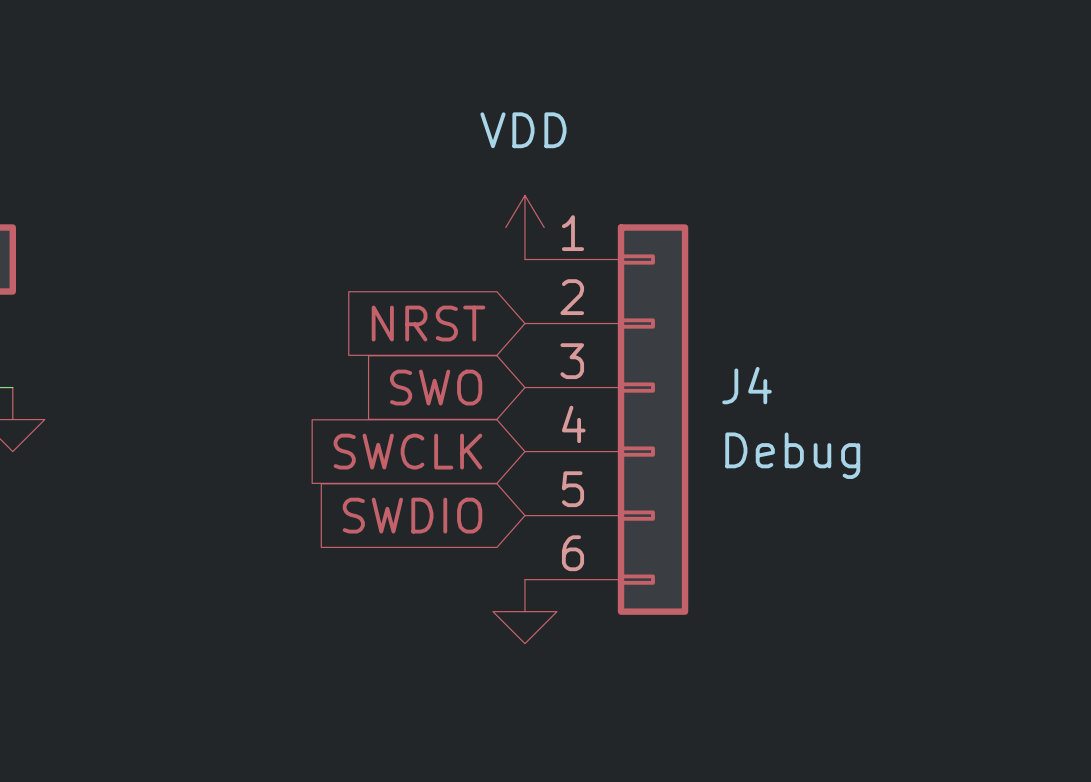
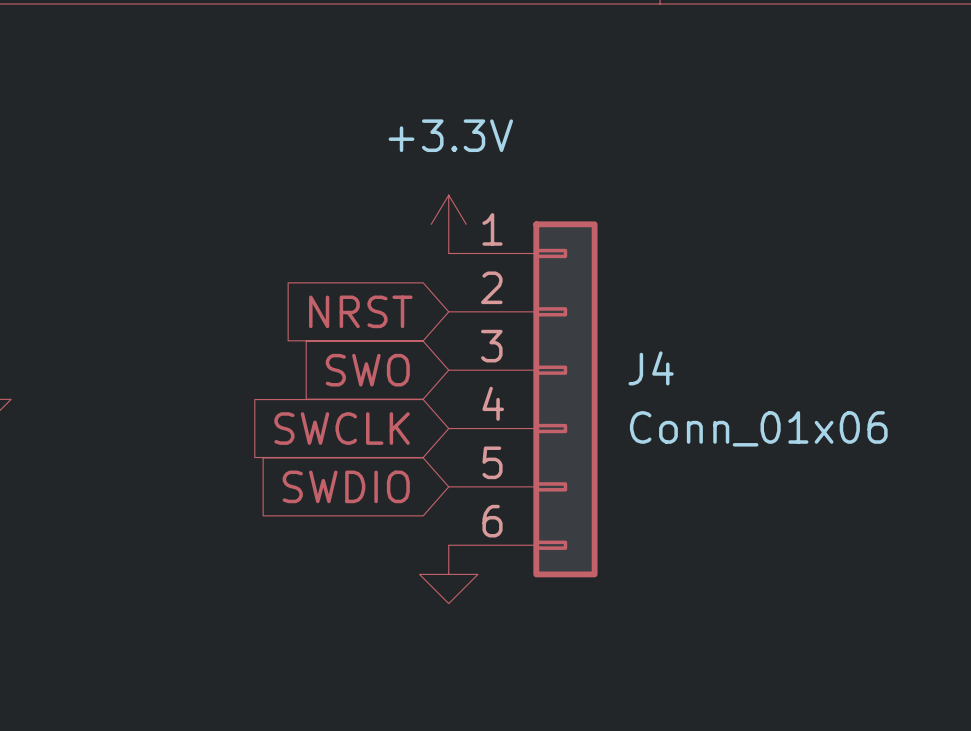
power symbol: VDD (524, 227) -> +3.3V (448, 224)
J4 value: Debug (792, 455) -> Conn_01x06 (758, 428)

